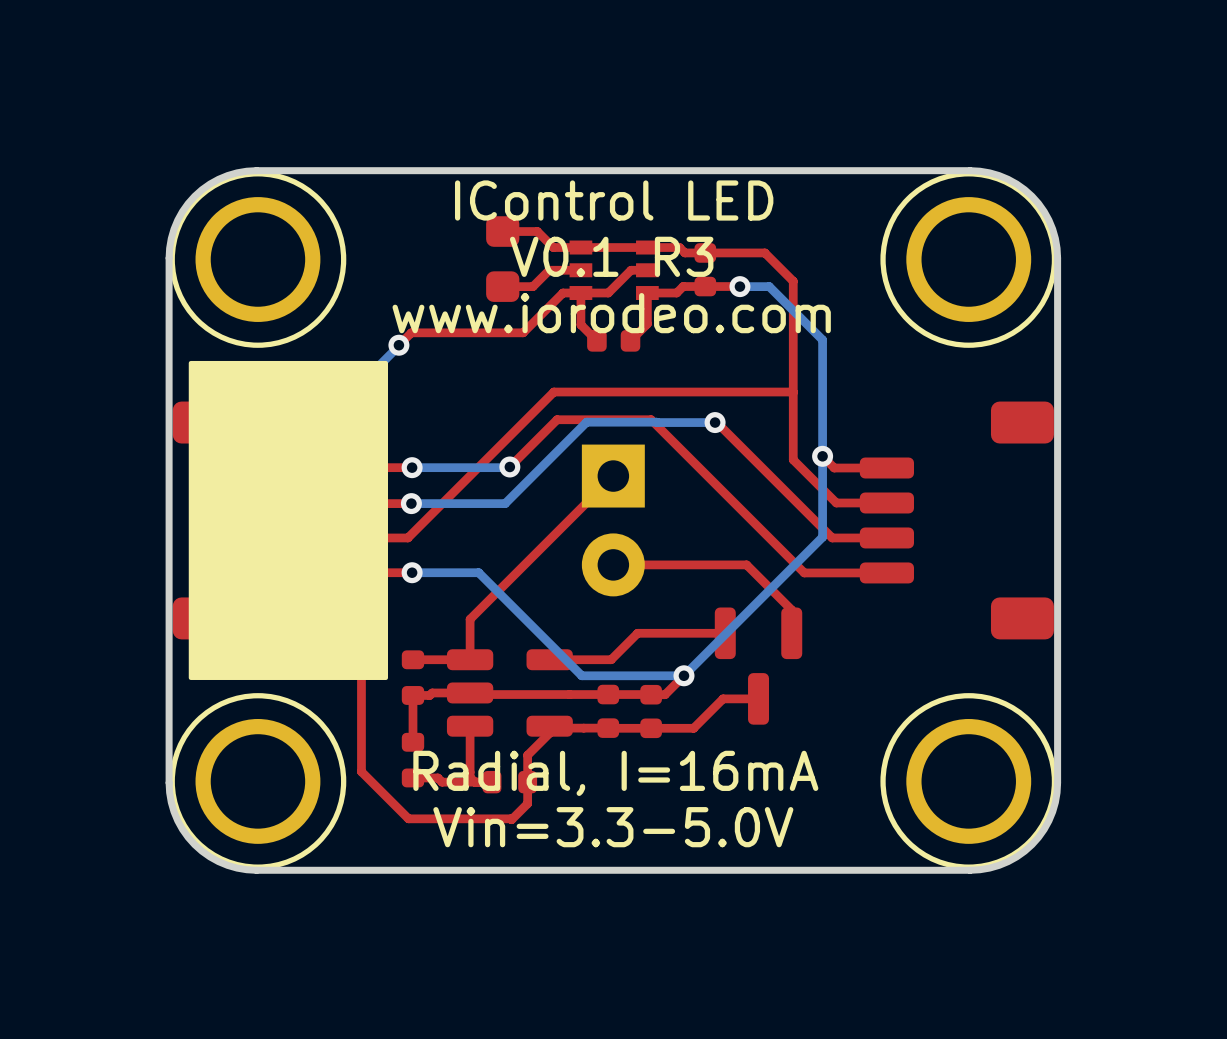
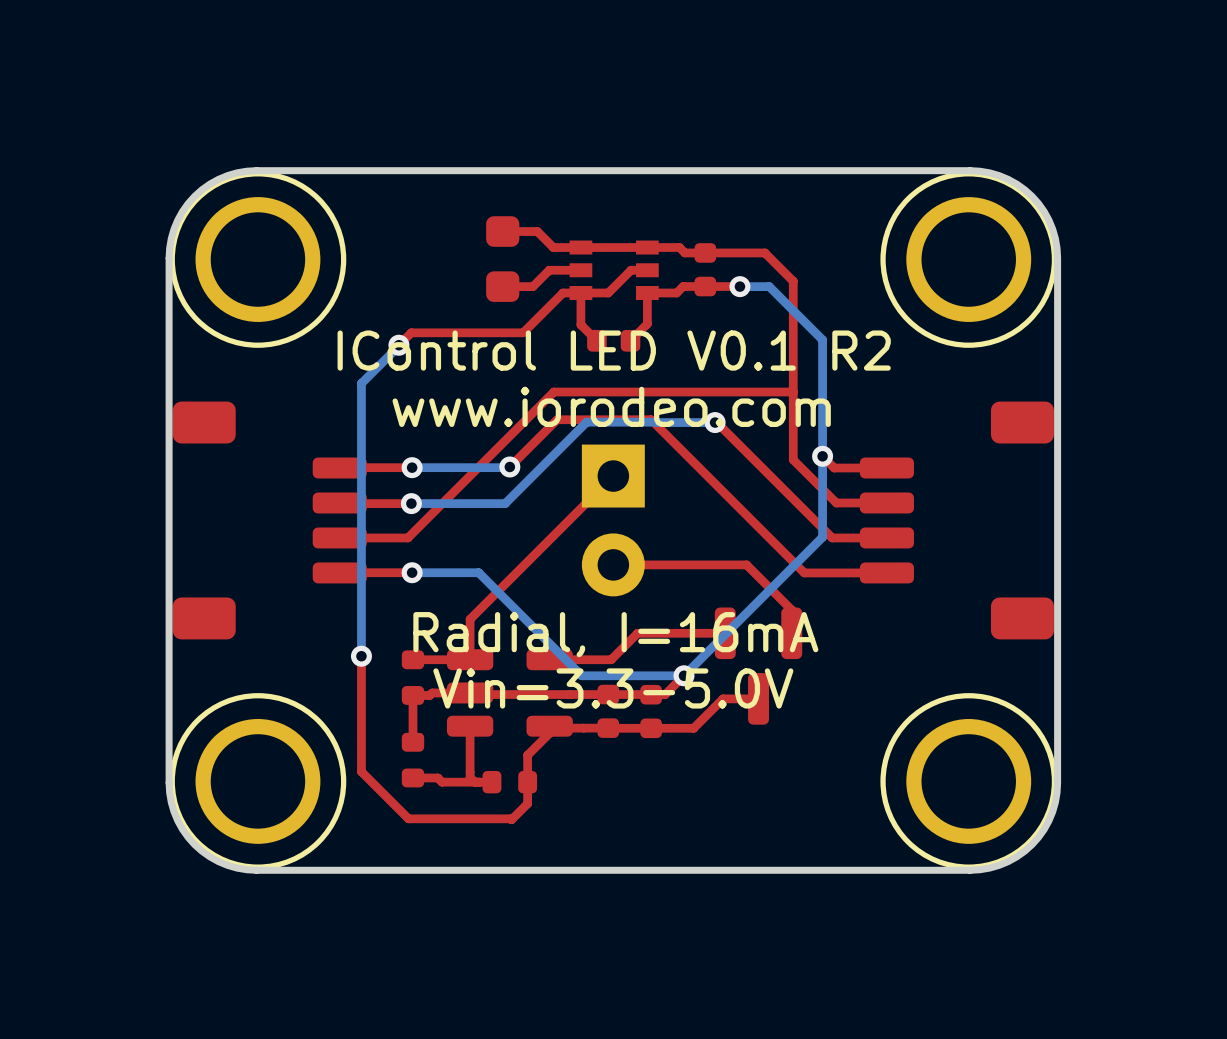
text: IControl LED (614, 200) -> none
text: V0.1 R3 (611, 256) -> none
text position: www.iorodeo.com (611, 313) -> www.iorodeo.com (611, 406)
text: none -> IControl LED V0.1 R2 (614, 350)
drawing: [188, 360, 388, 680] -> none
text position: Radial, I=16mA (615, 773) -> Radial, I=16mA (615, 634)
text position: Vin=3.3-5.0V (613, 827) -> Vin=3.3-5.0V (613, 688)

